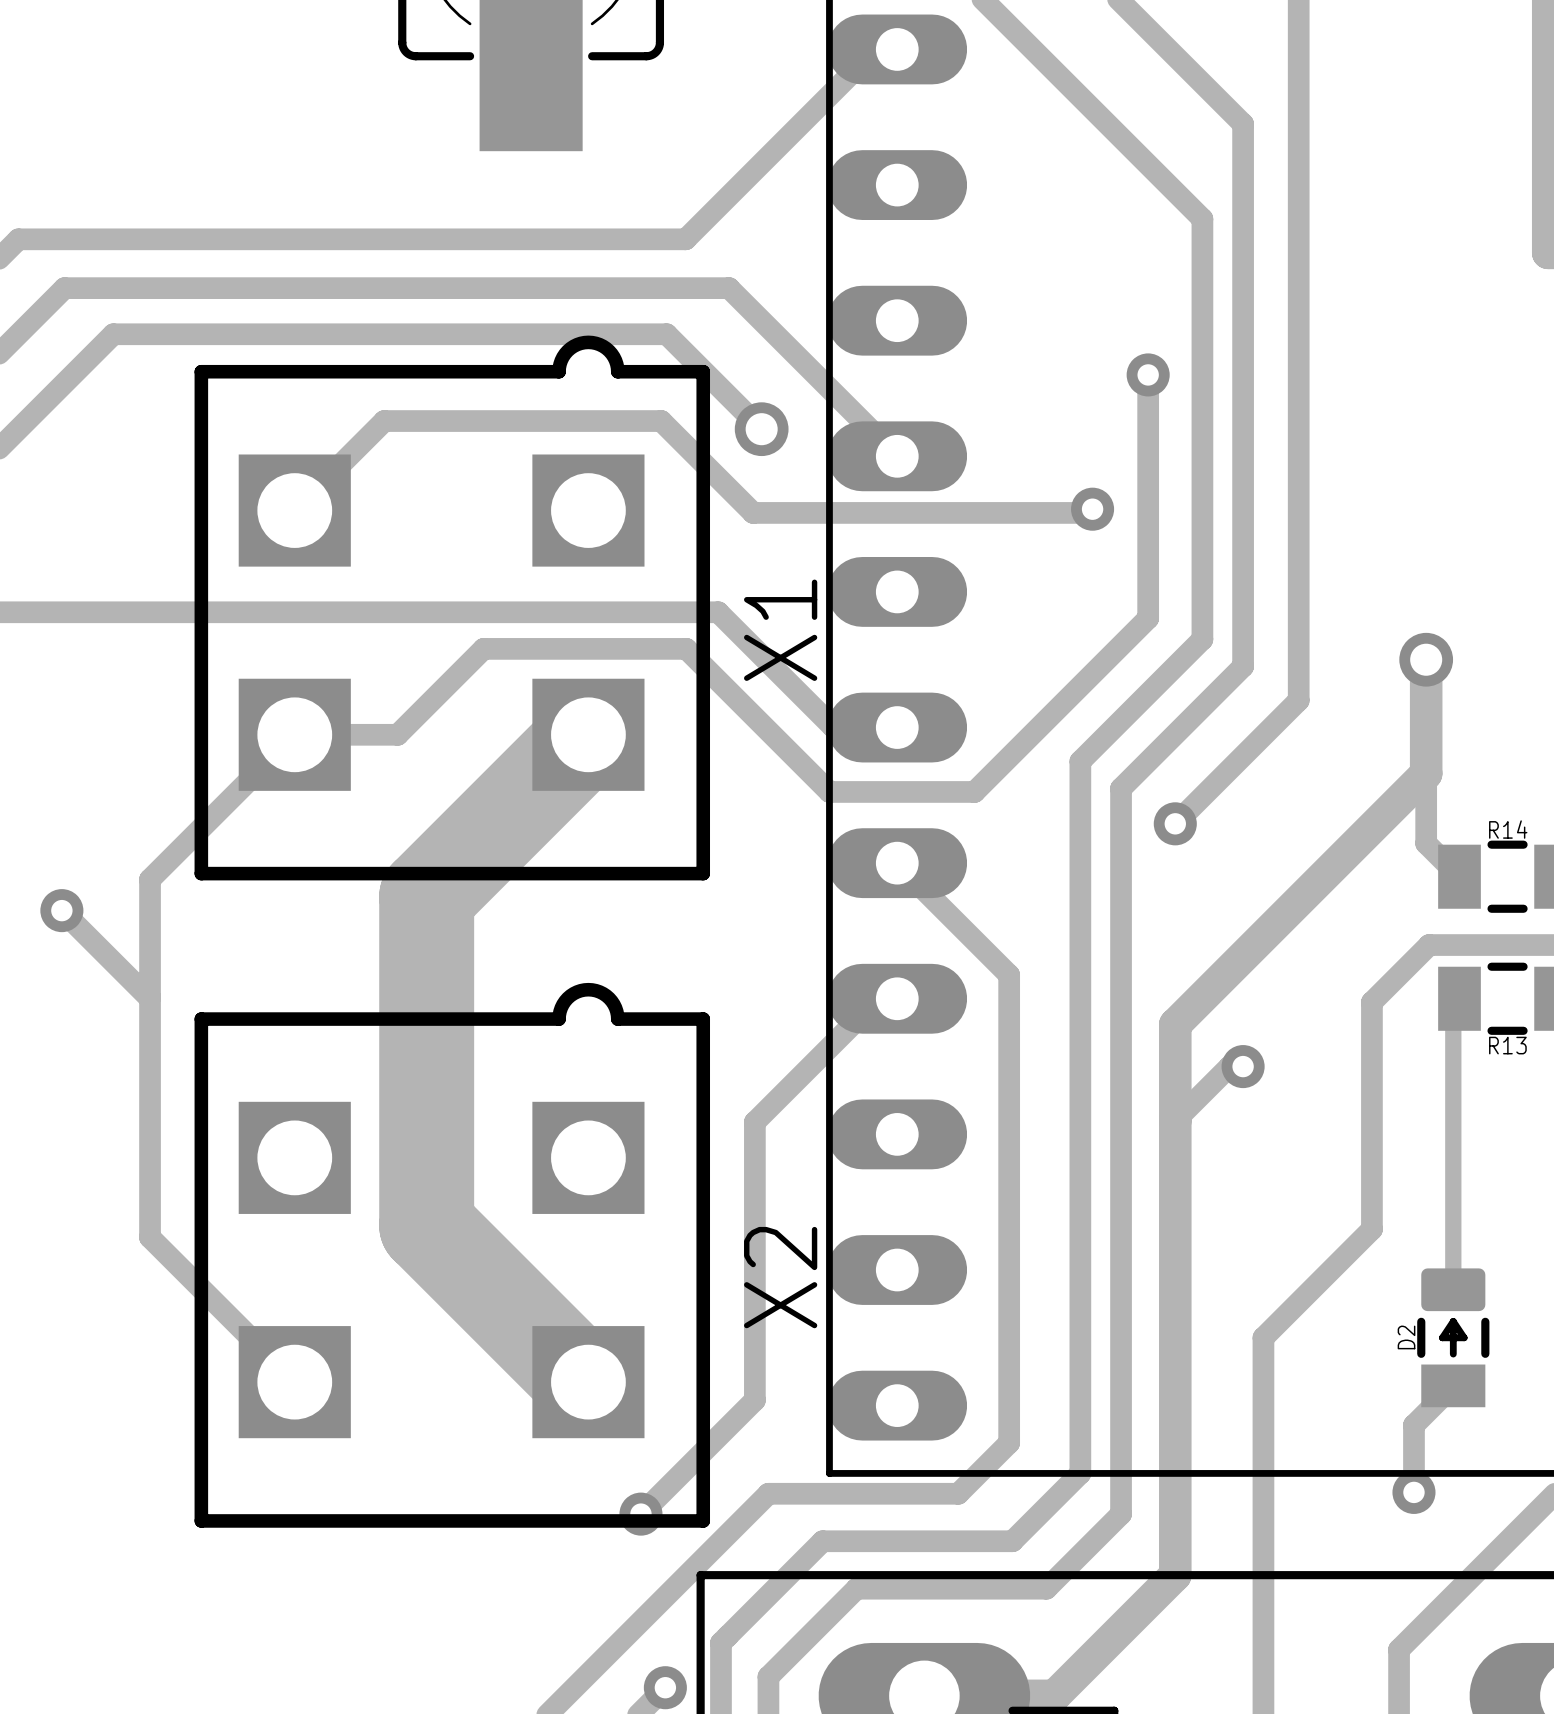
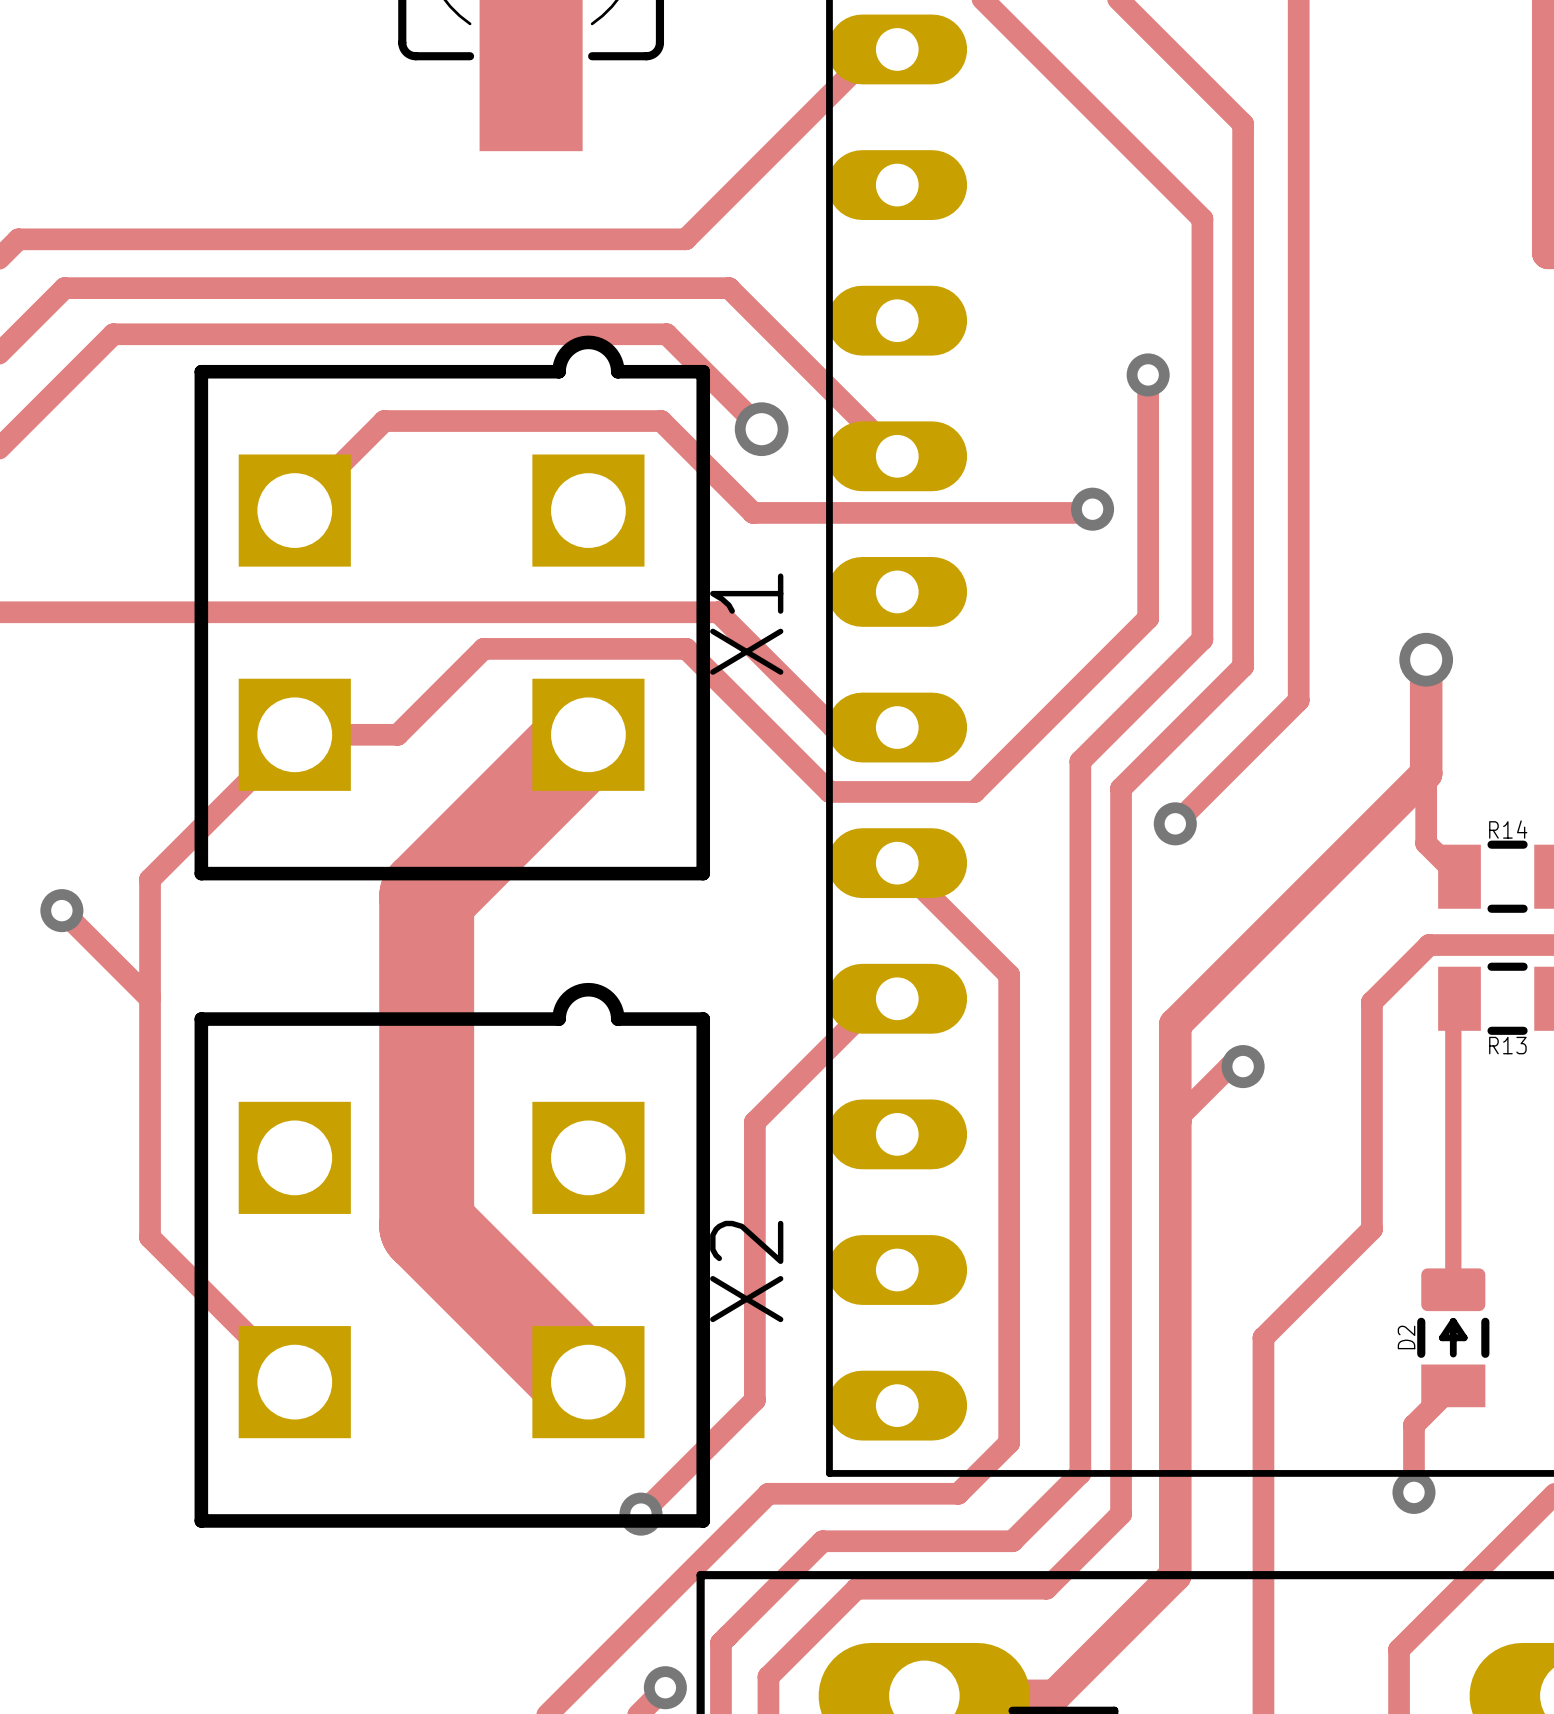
X1 name position: X1 (780, 630) -> X1 (746, 624)
X2 name position: X2 (780, 1277) -> X2 (746, 1271)

